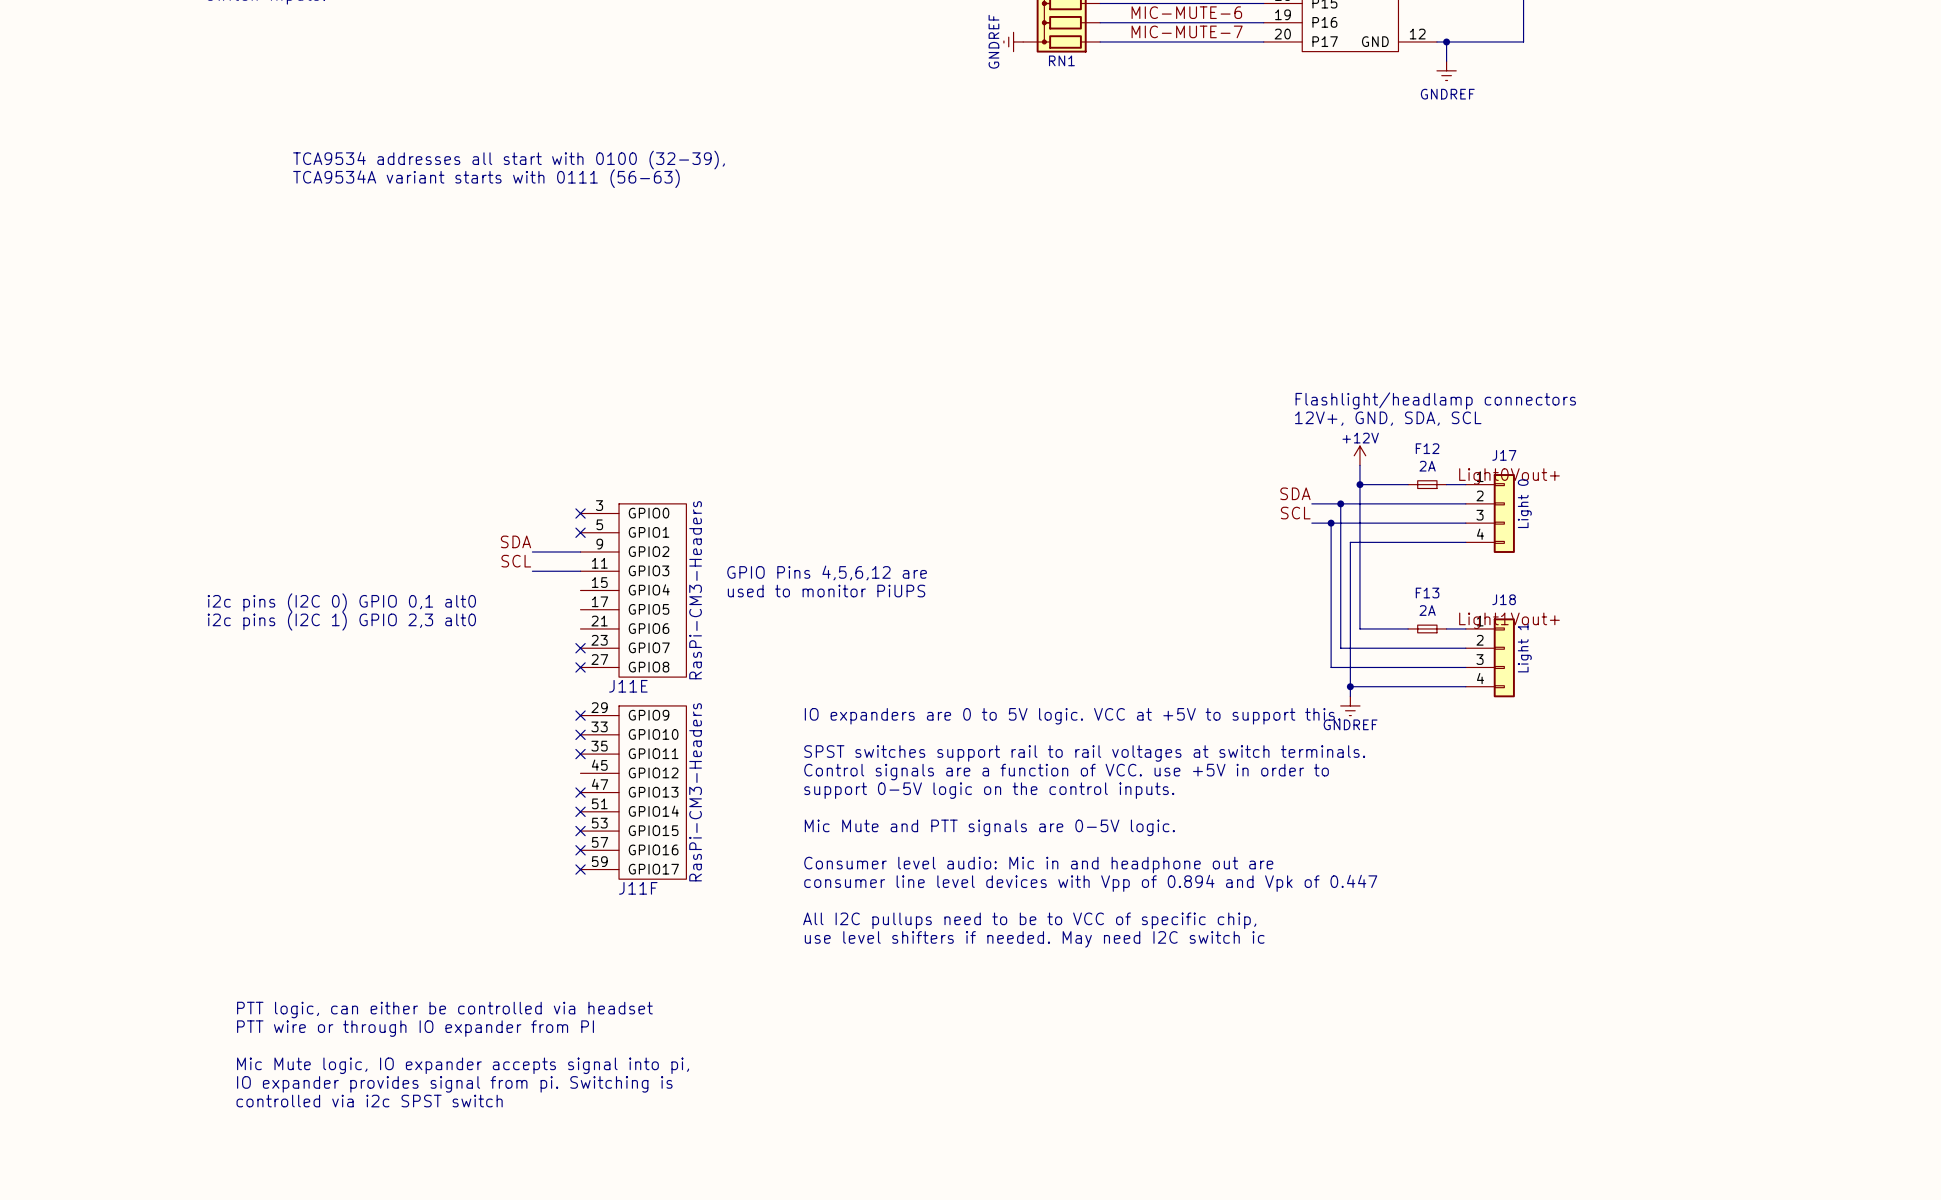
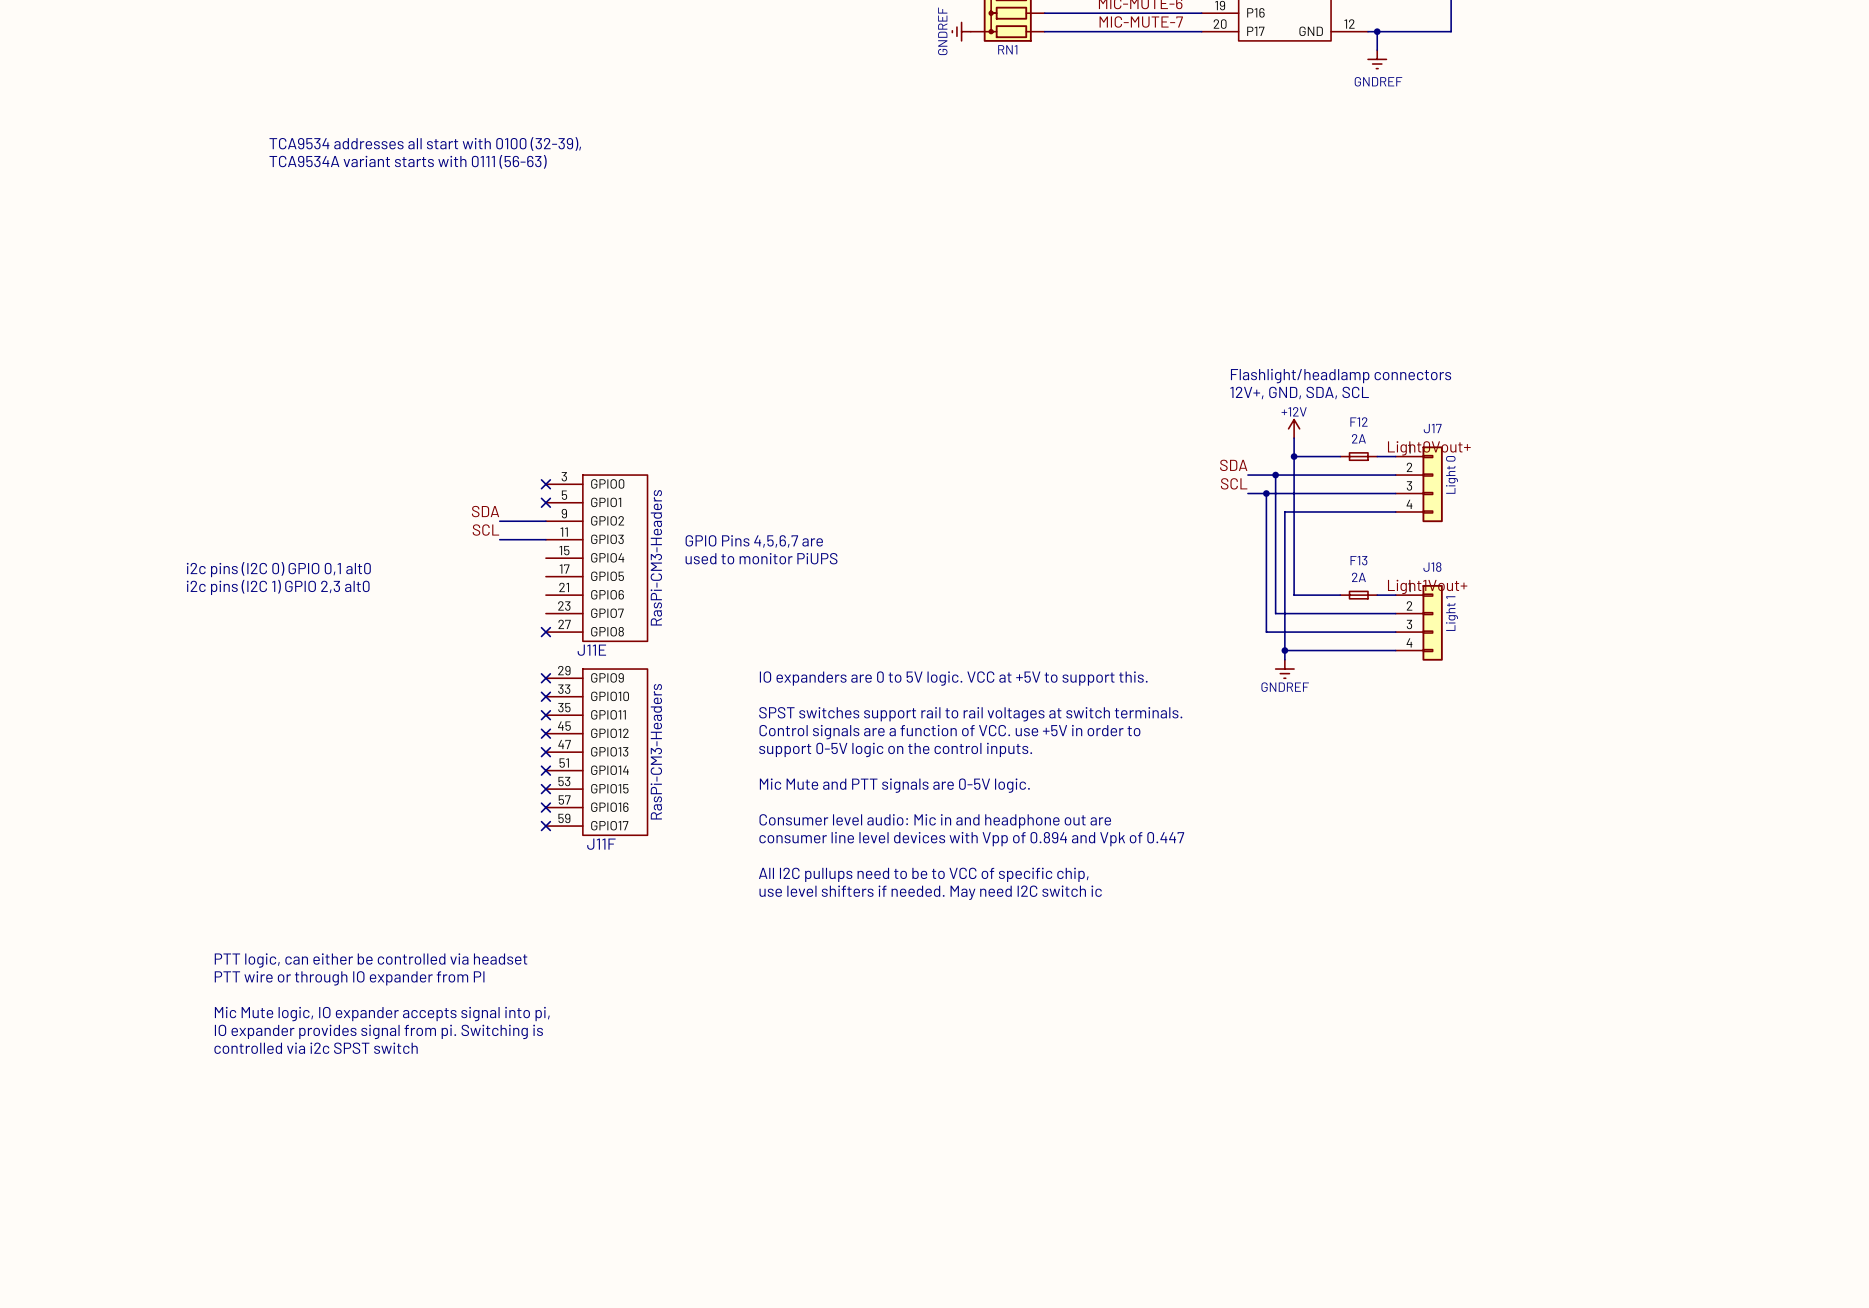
text: GPIO Pins 4,5,6,12 are (827, 572) -> GPIO Pins 4,5,6,7 are (754, 541)
no-connect mark: (580, 648) -> none
no-connect mark: none -> (545, 733)

